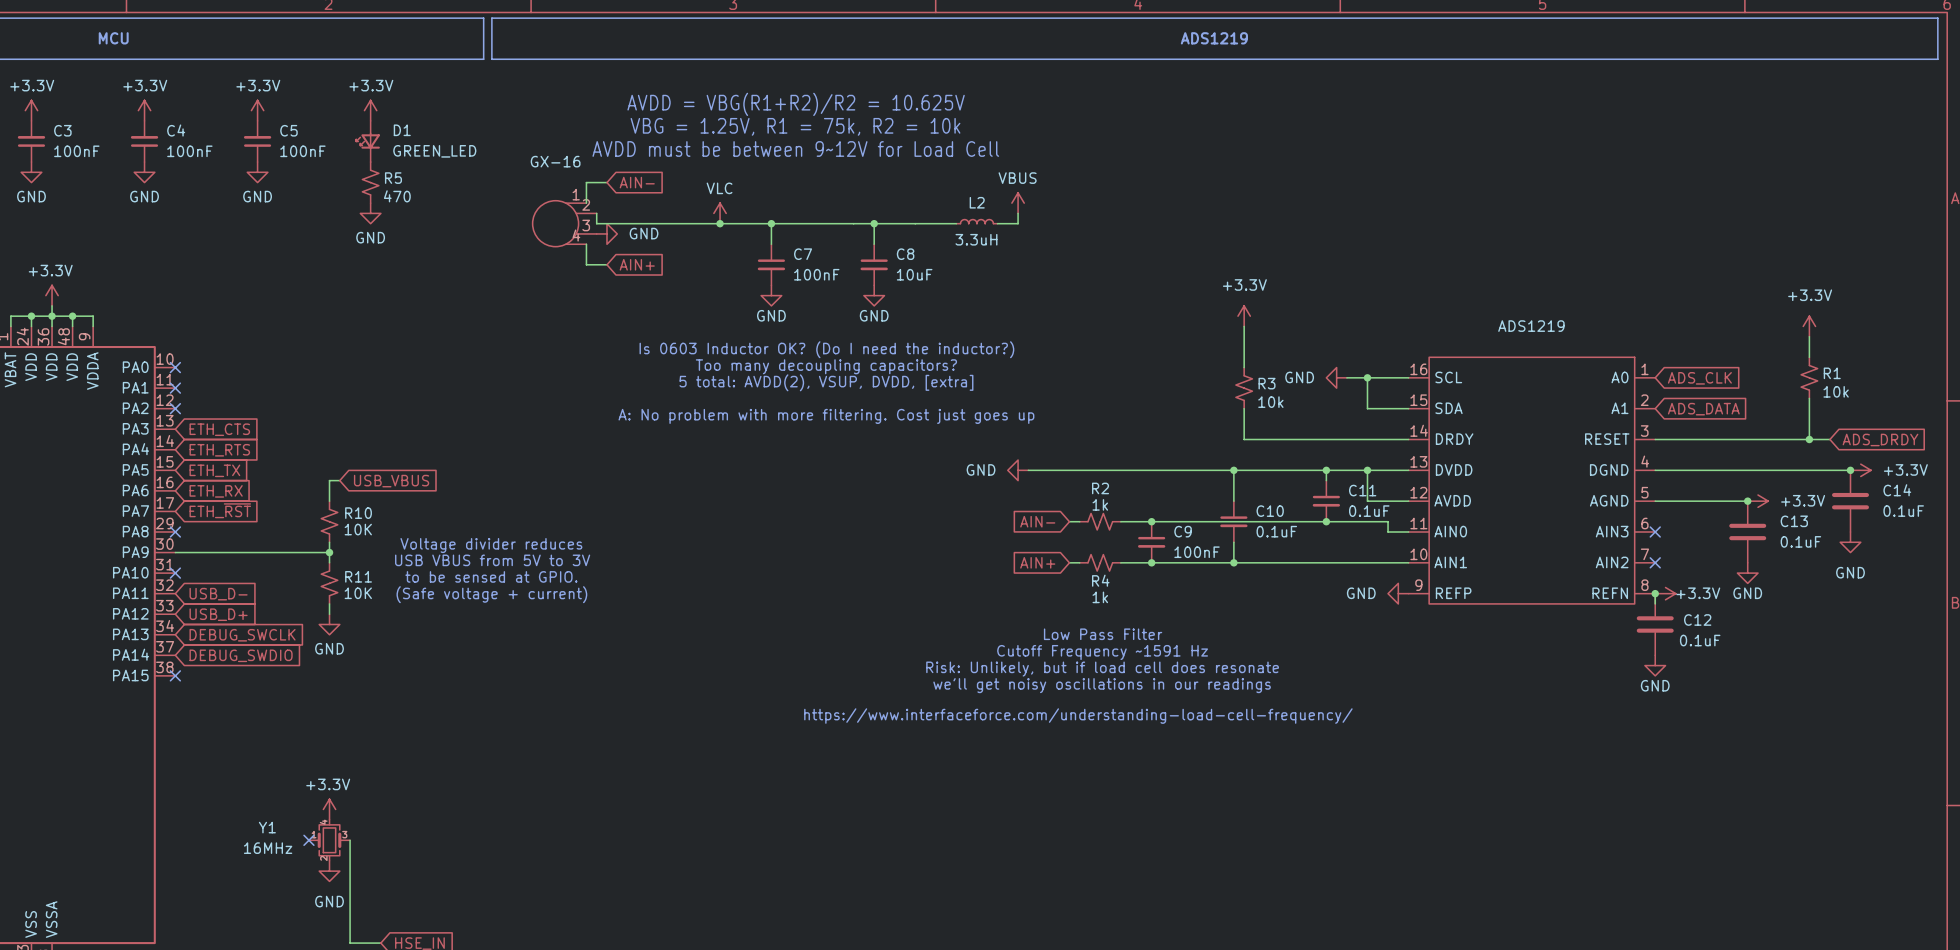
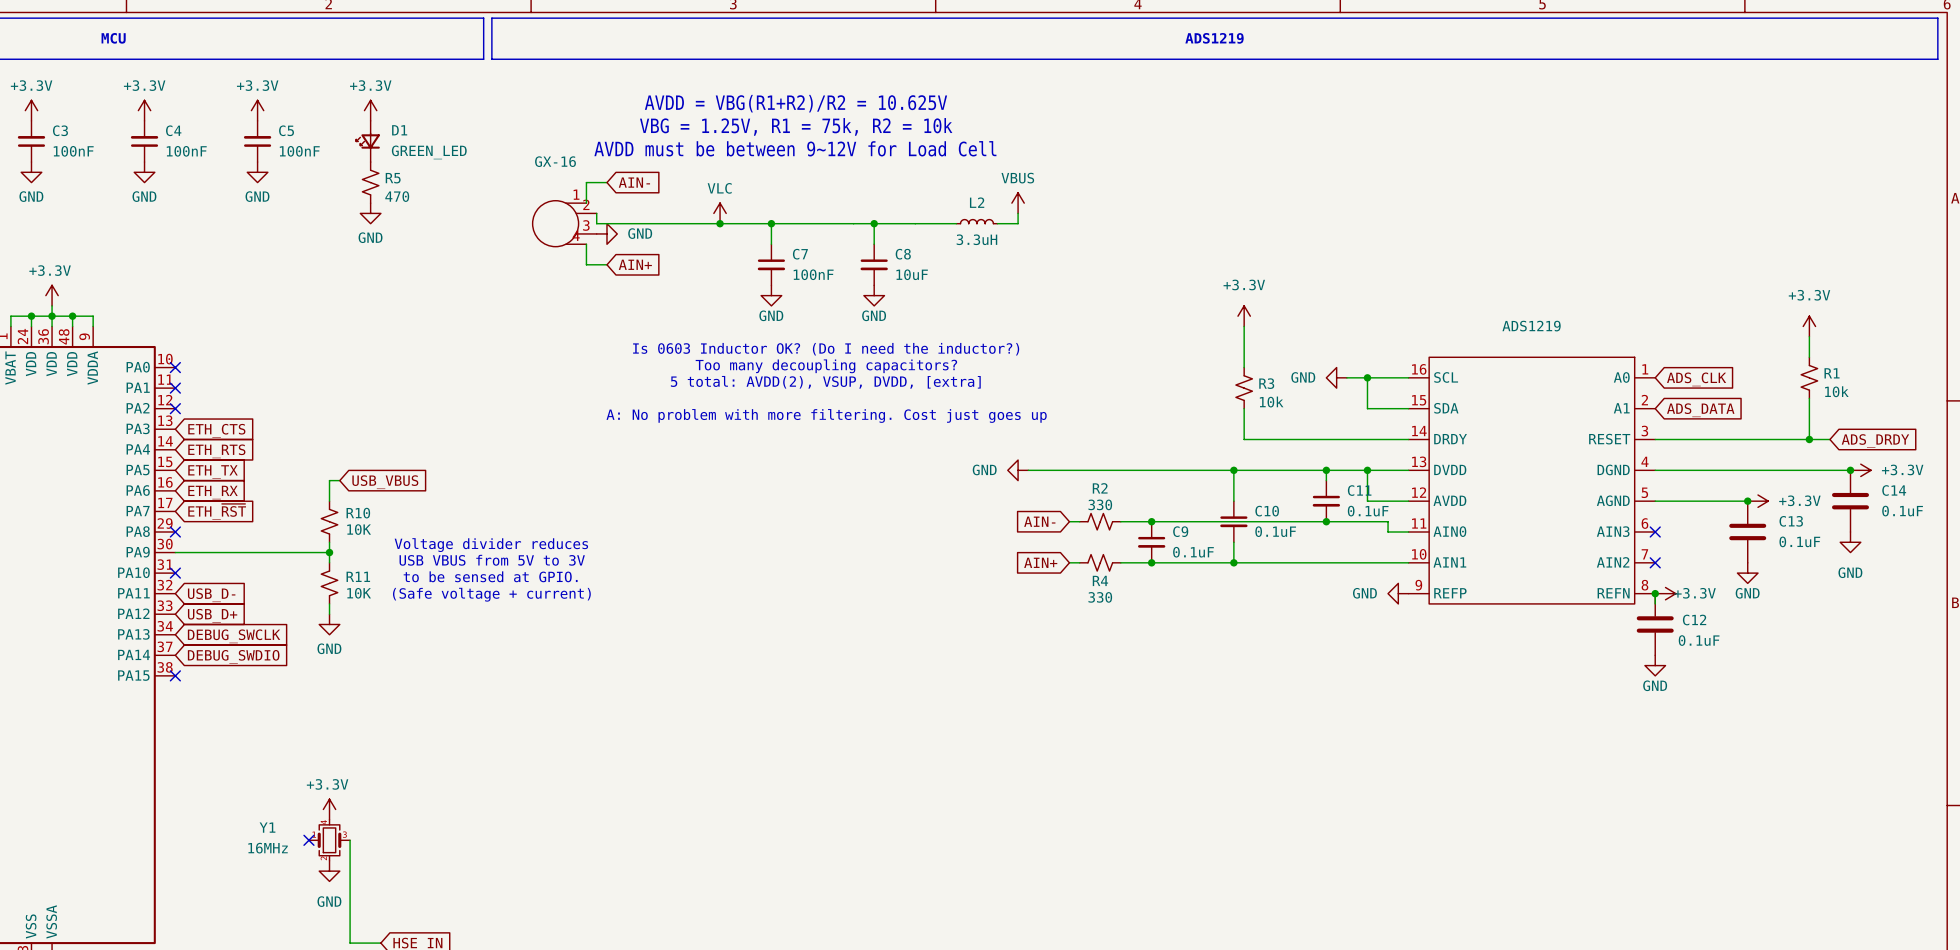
R2 value: 1k (1100, 504) -> 330 (1100, 504)
C9 value: 100nF (1197, 552) -> 0.1uF (1193, 552)
R4 value: 1k (1100, 597) -> 330 (1100, 597)
text: Low Pass Filter (1103, 634) -> none
text: Cutoff Frequency ~1591 Hz (1102, 652) -> none
text: Risk: Unlikely, but if load cell does resonate (1102, 669) -> none
text: we'll get noisy oscillations in our readings (1102, 685) -> none
text: https://www.interfaceforce.com/understanding-load-cell-frequency/ (1078, 716) -> none

